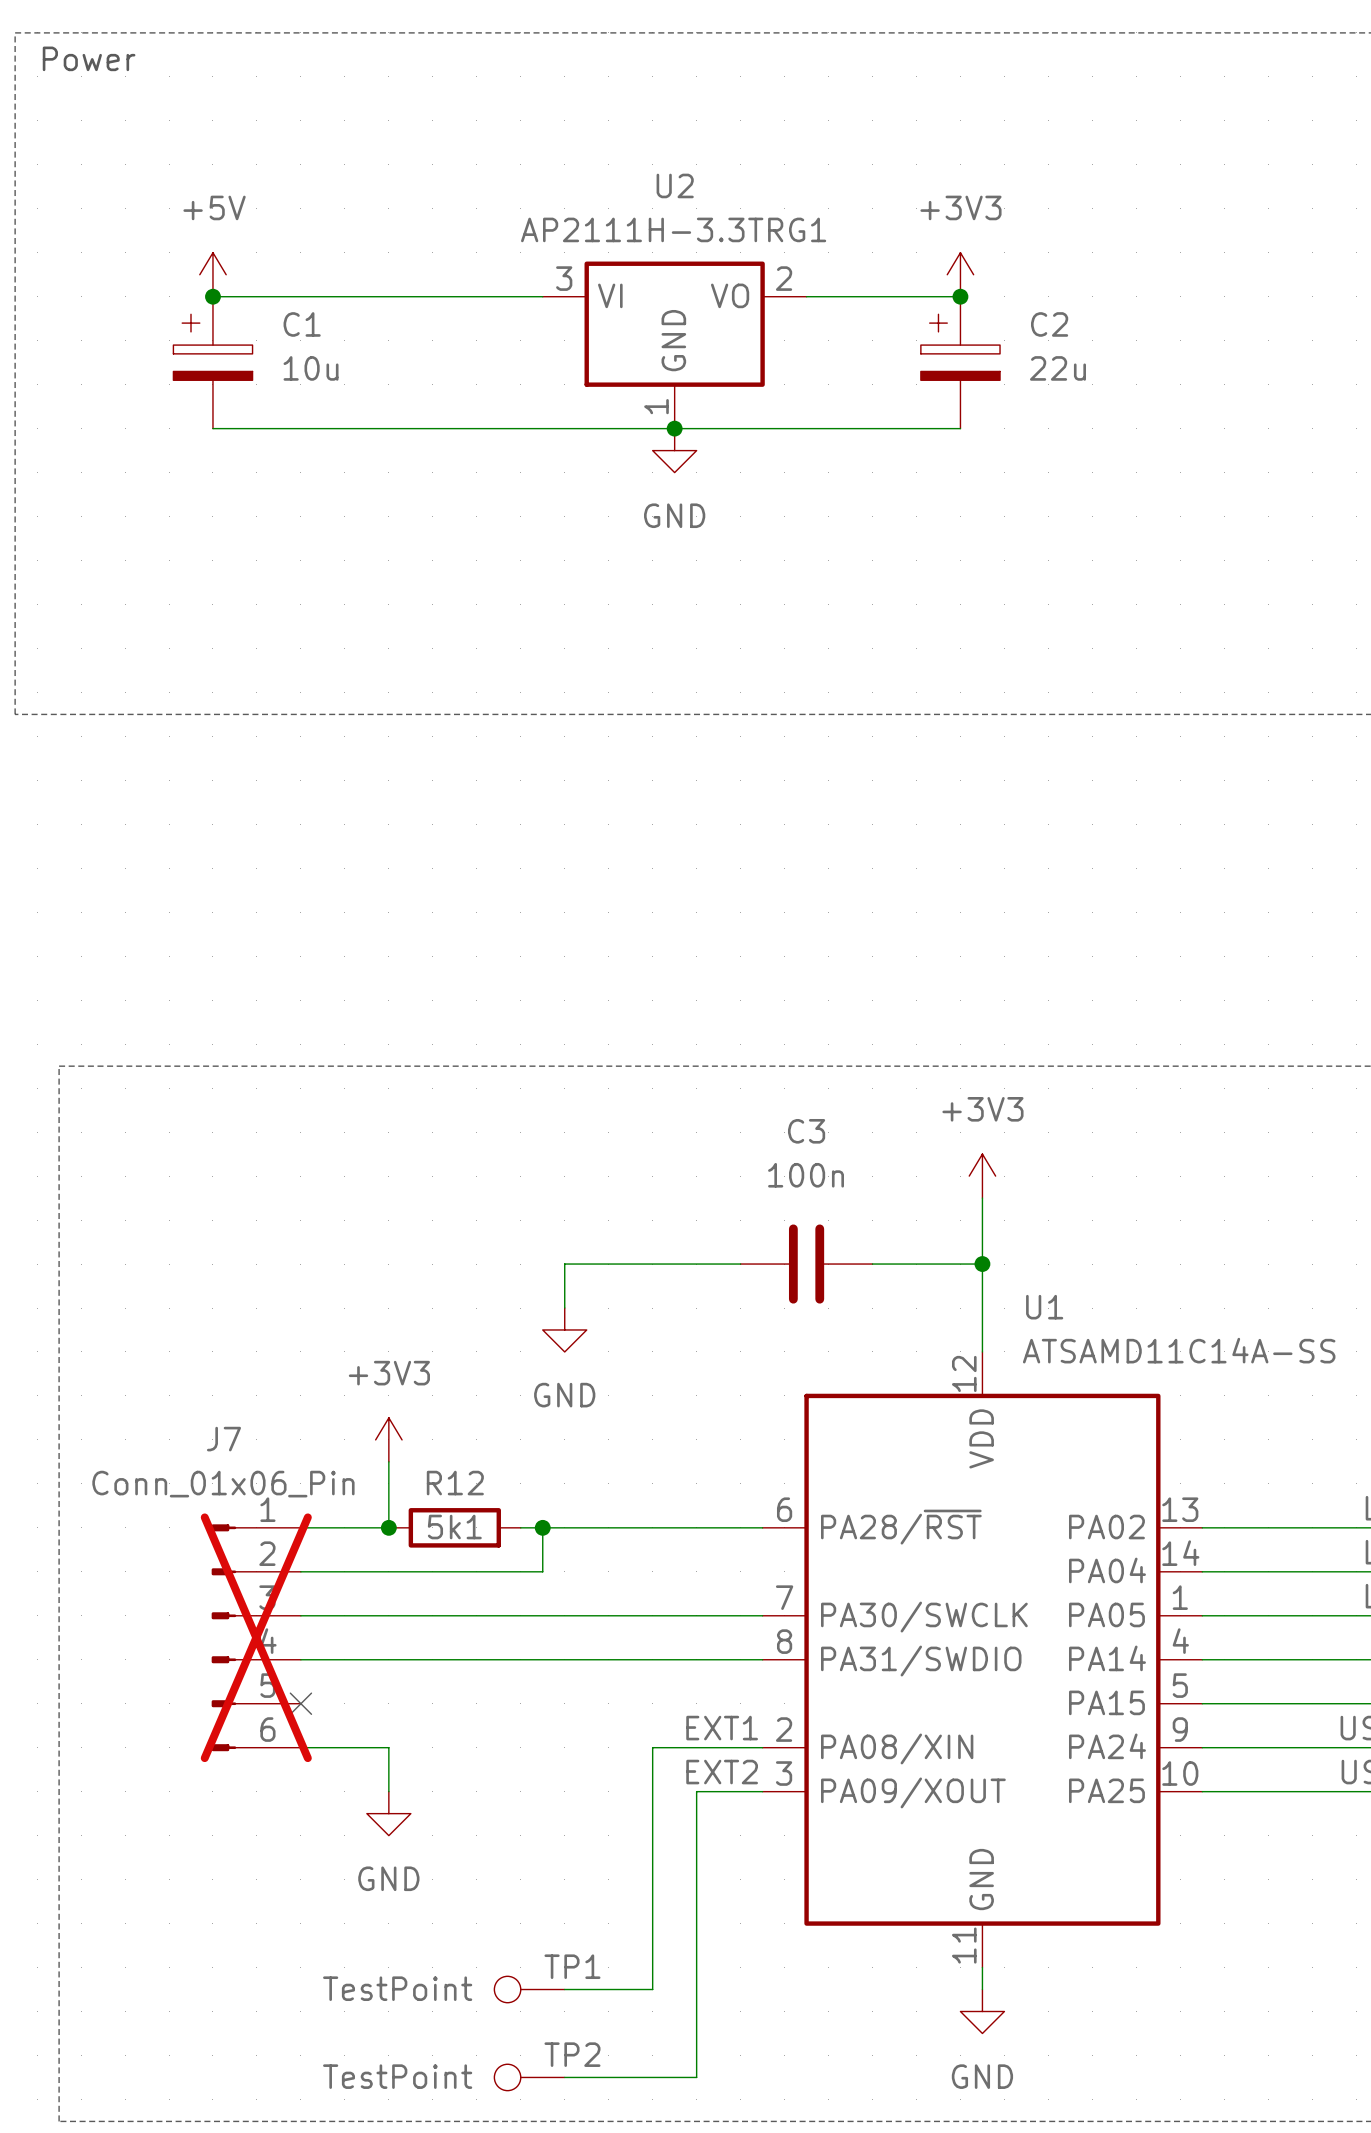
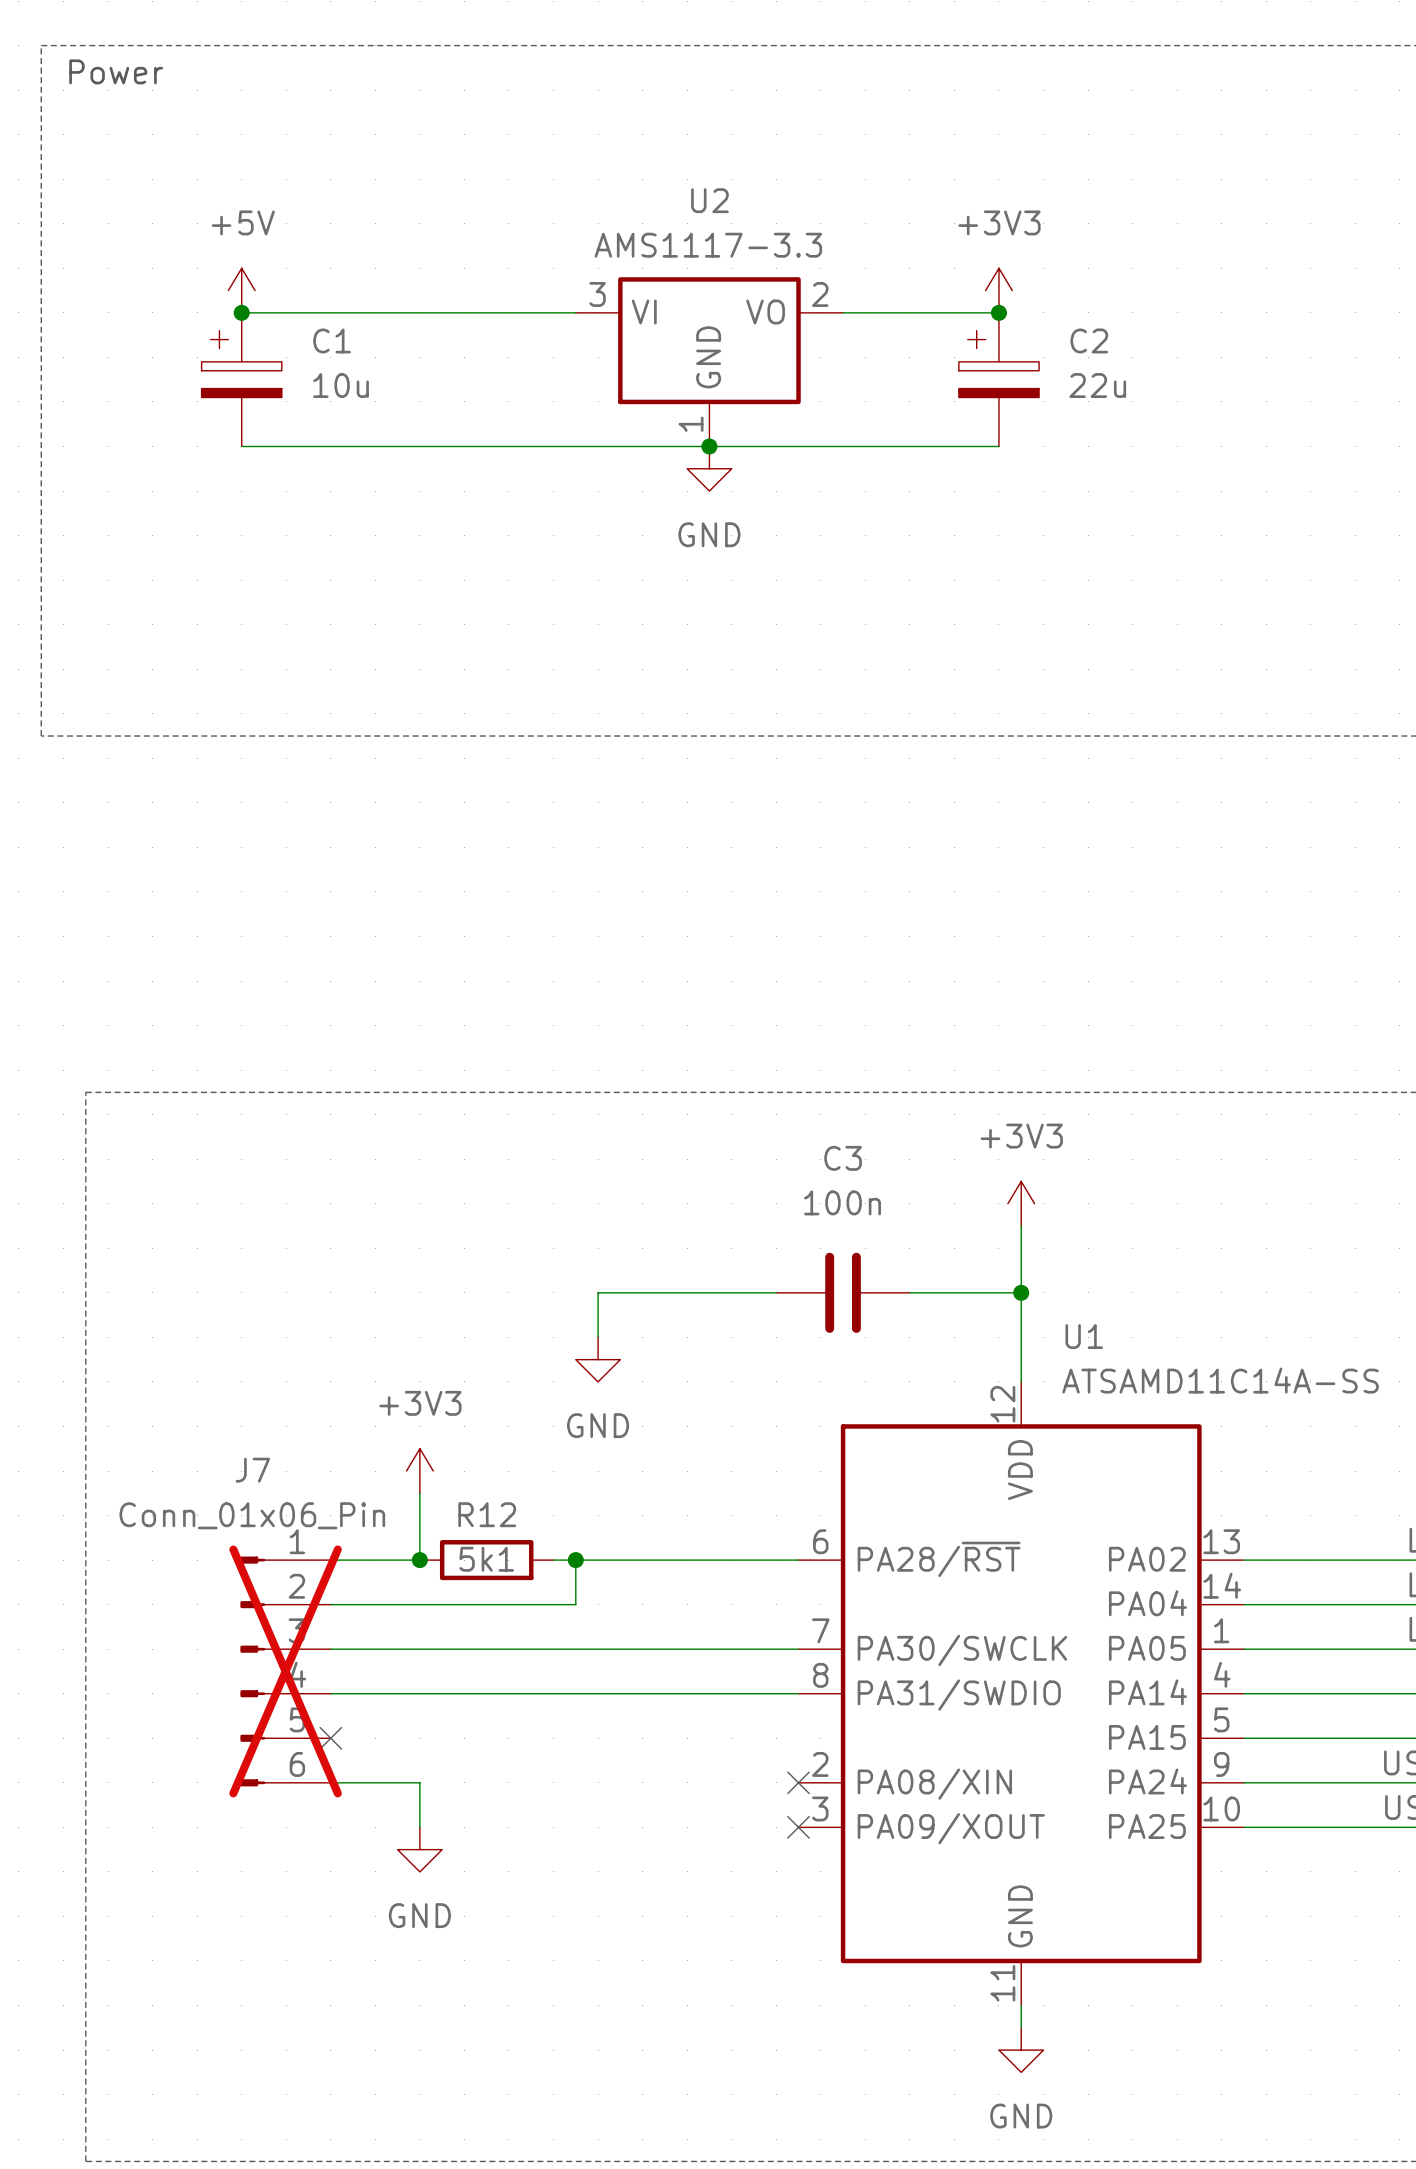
U2 value: AP2111H-3.3TRG1 (673, 229) -> AMS1117-3.3 (708, 245)
label: EXT1 (722, 1728) -> none
wire: (762, 1747) (652, 1747) (652, 1989) (564, 1989) -> none
no-connect mark: none -> (798, 1782)
label: EXT2 (722, 1772) -> none
wire: (762, 1791) (696, 1791) (696, 2077) (564, 2077) -> none
no-connect mark: none -> (798, 1827)
TP1: TestPoint (529, 1989) -> none
TP2: TestPoint (529, 2077) -> none

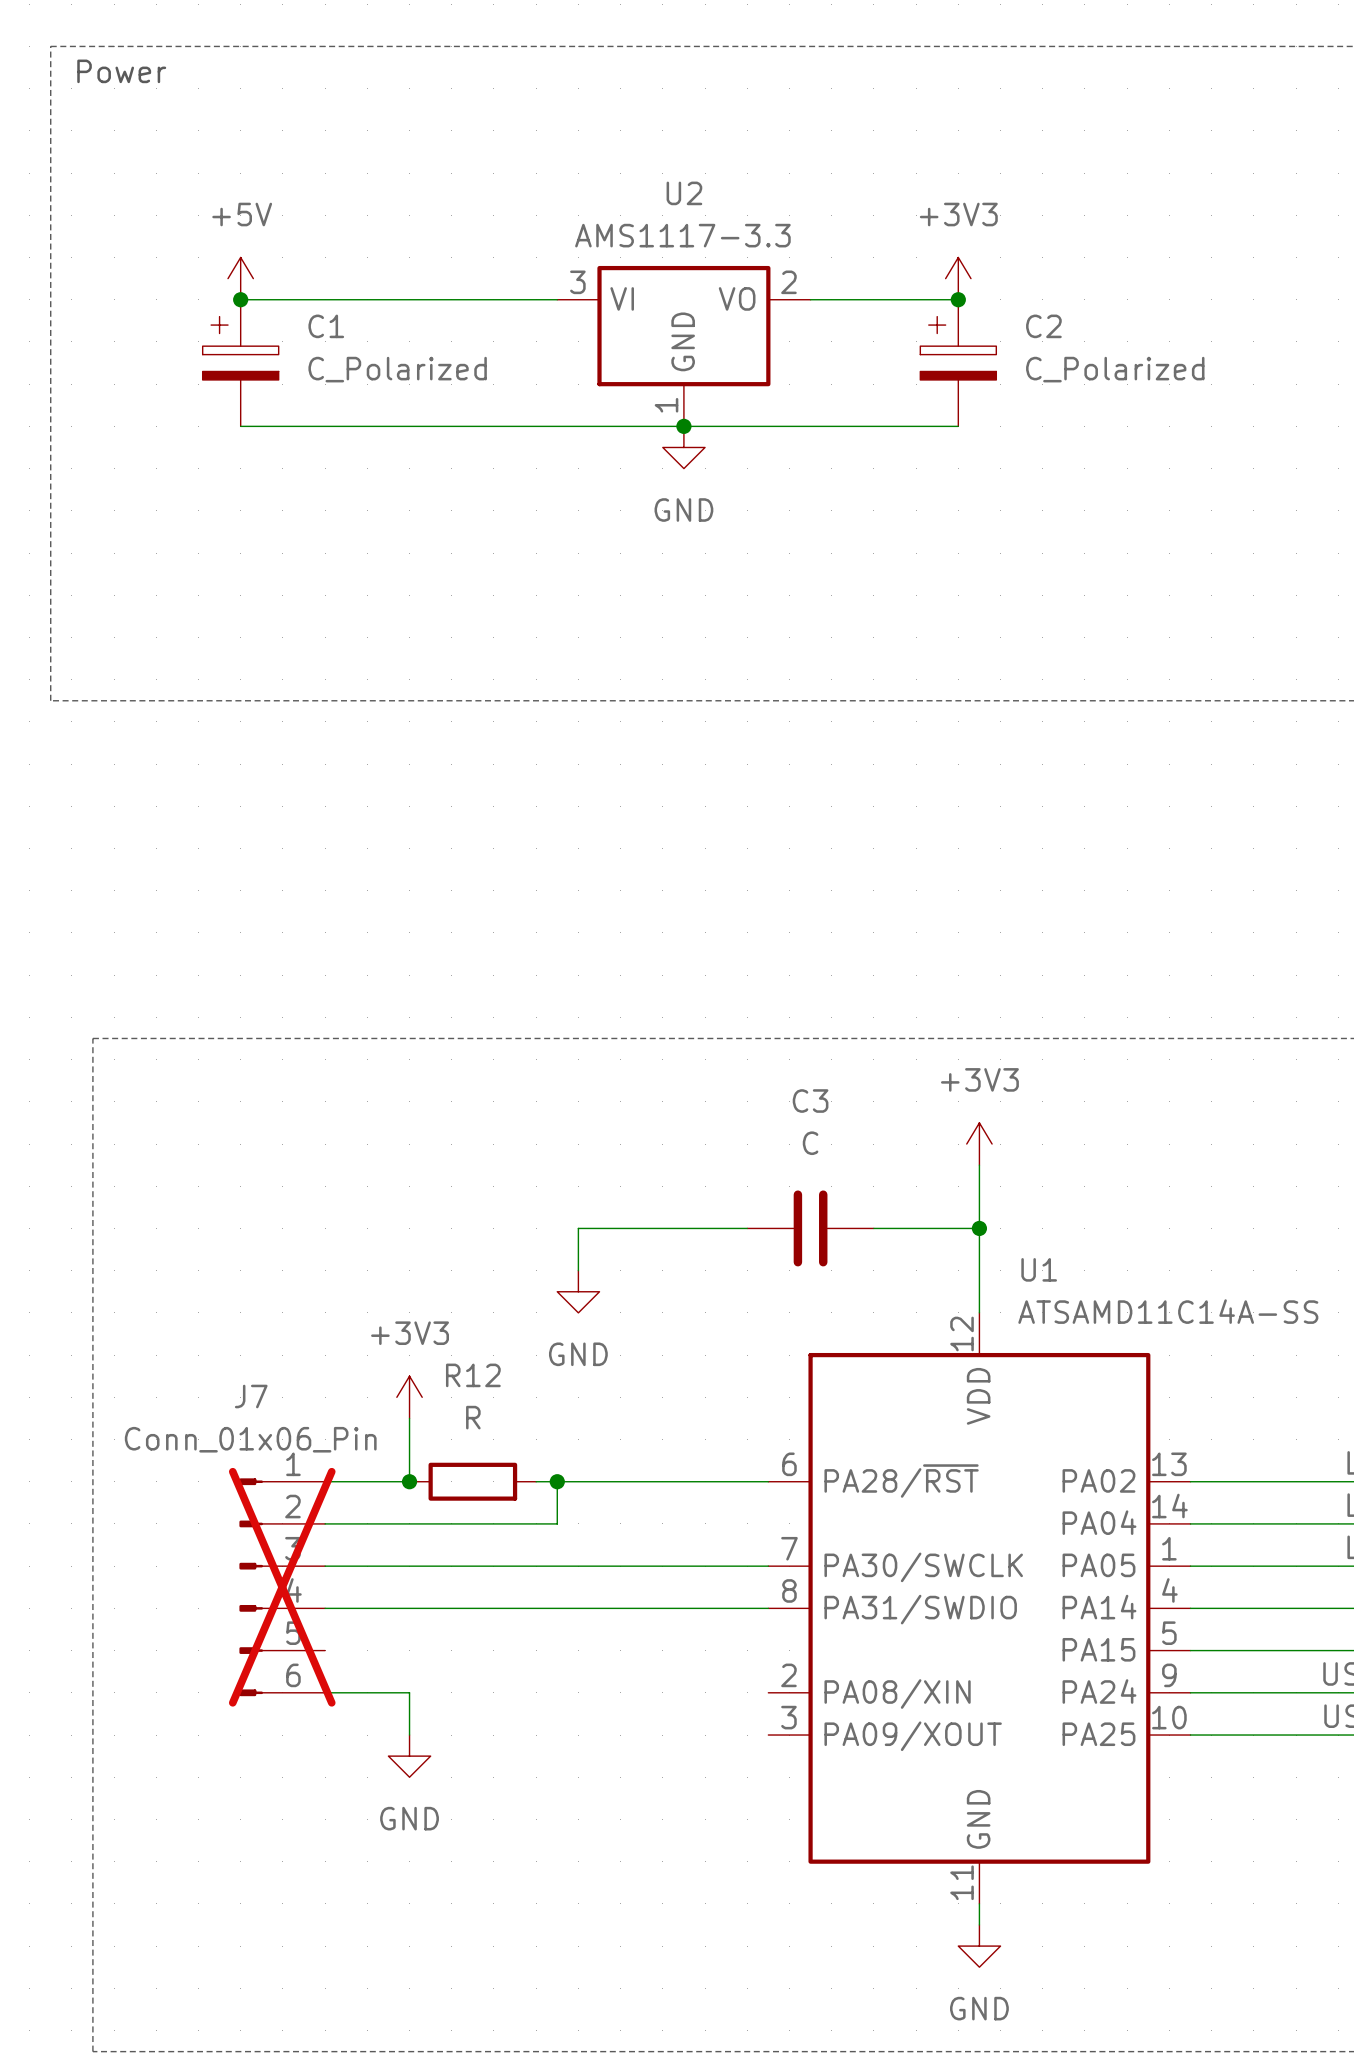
C1 value: 10u (341, 385) -> C_Polarized (397, 369)
C2 value: 22u (1097, 385) -> C_Polarized (1115, 369)
C3 value: 100n (842, 1202) -> C (810, 1143)
R12 name position: R12 (487, 1514) -> R12 (473, 1375)
R12 value: 5k1 (486, 1559) -> R (473, 1417)
no-connect mark: (330, 1738) -> none
no-connect mark: (798, 1782) -> none
no-connect mark: (798, 1827) -> none

